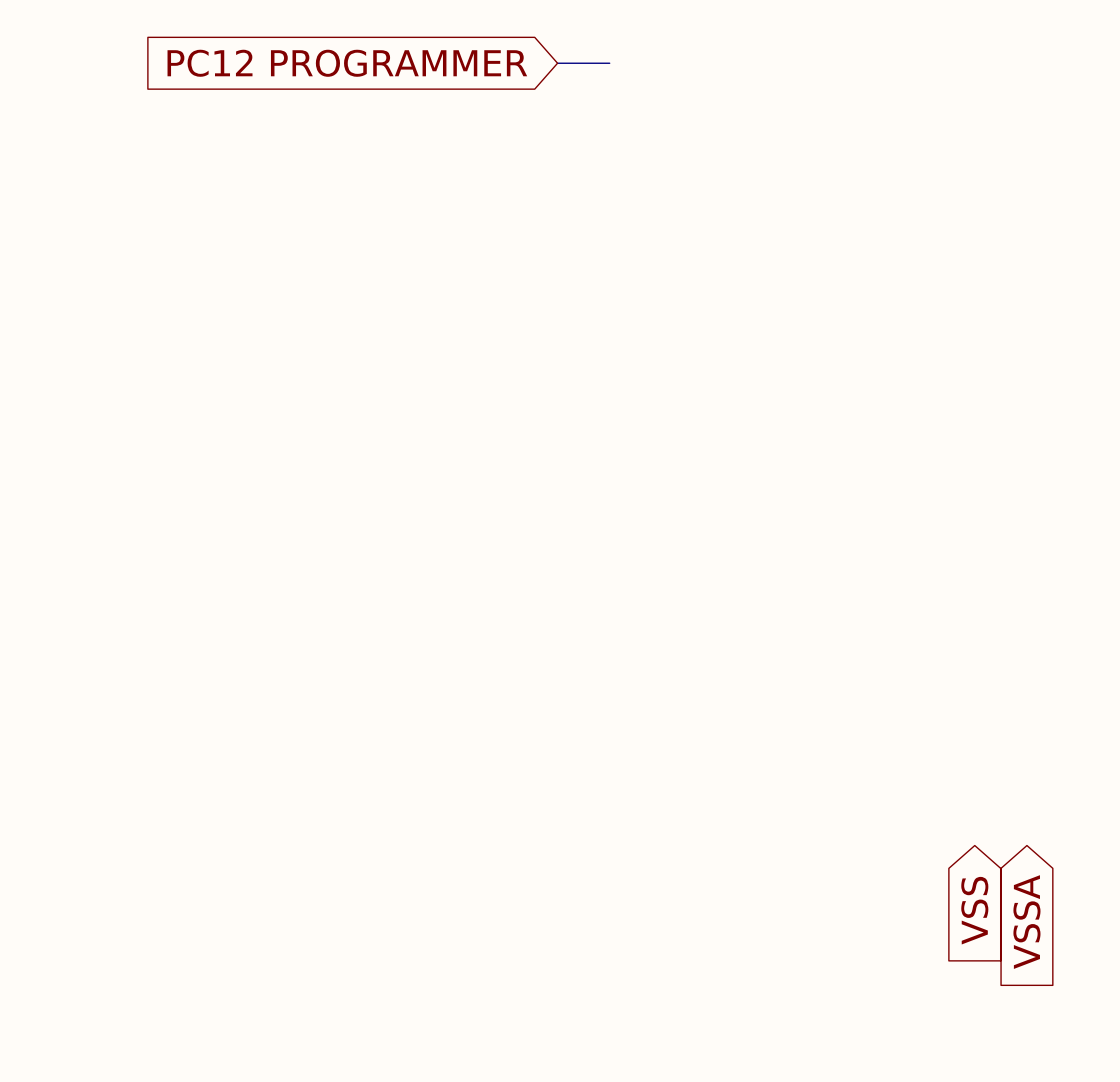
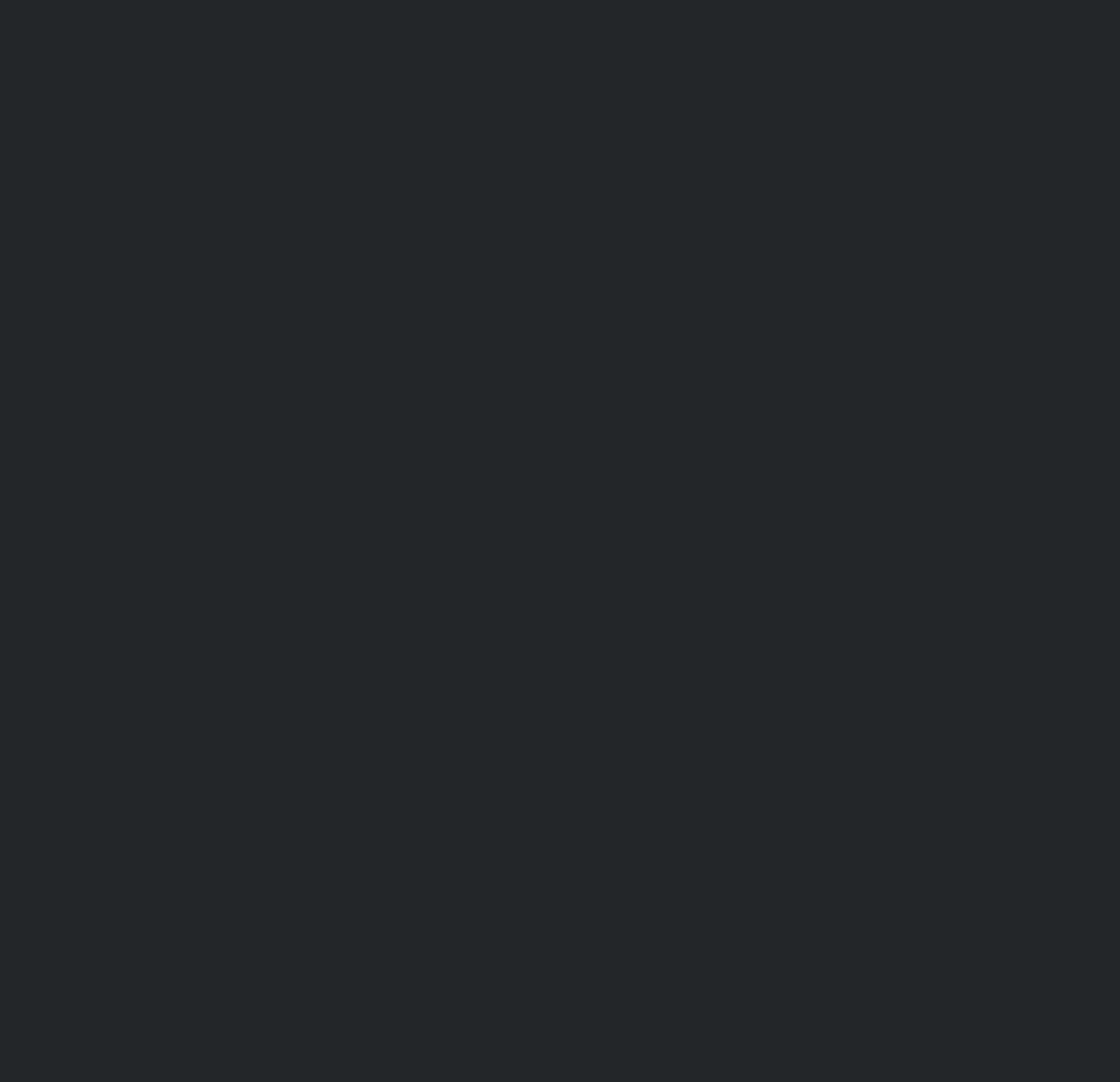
global label: PC12 PROGRAMMER (347, 63) -> none
wire: (557, 63) (609, 63) -> none
global label: VSS (974, 910) -> none
global label: VSSA (1026, 922) -> none

